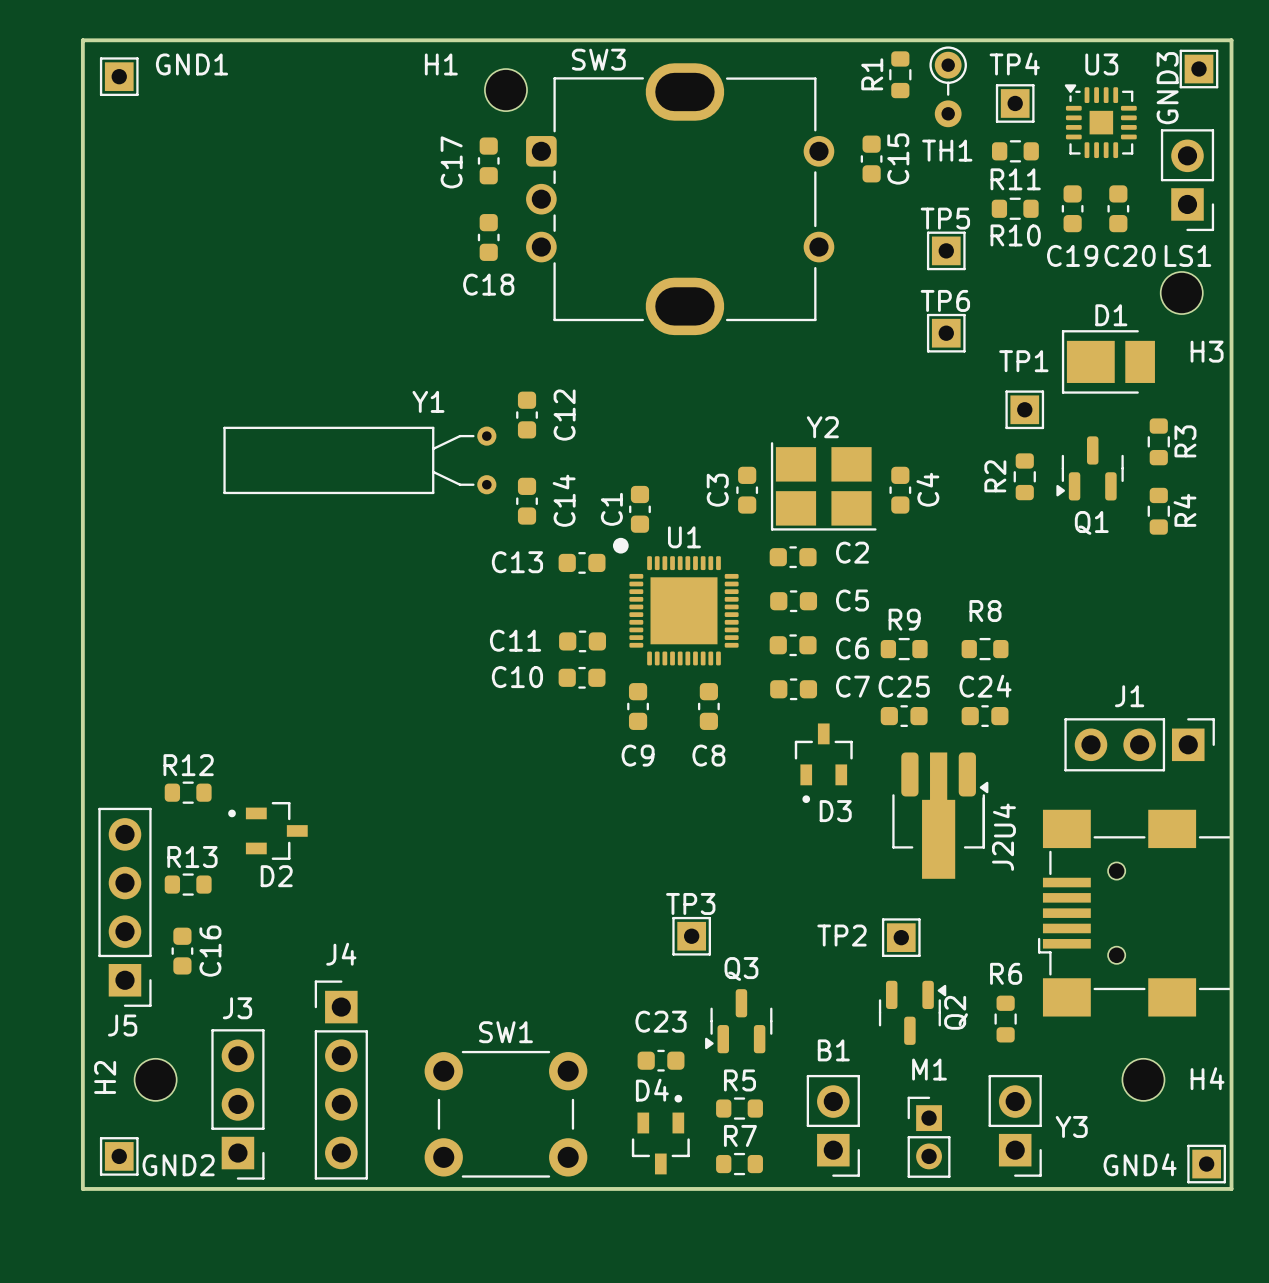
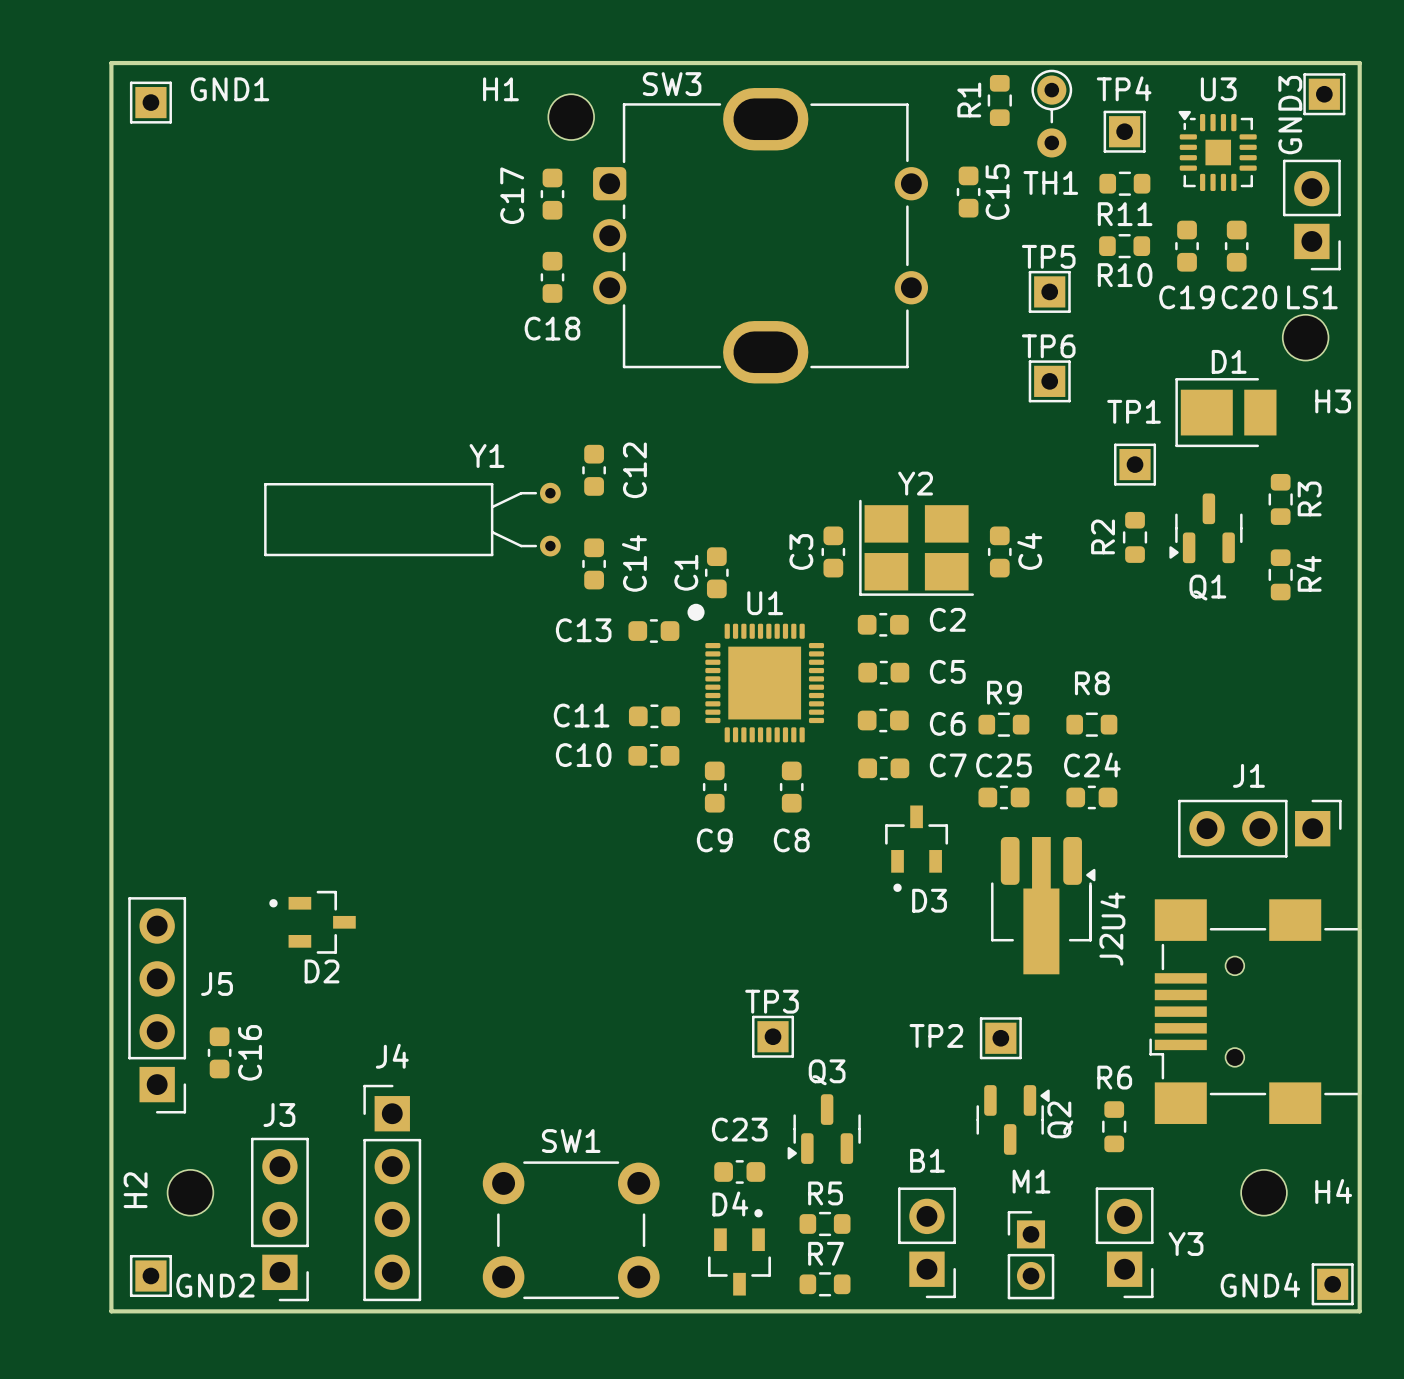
R12: (188, 792) -> none
R13: (188, 884) -> none
J5 name position: J5 (122, 1025) -> J5 (217, 983)

